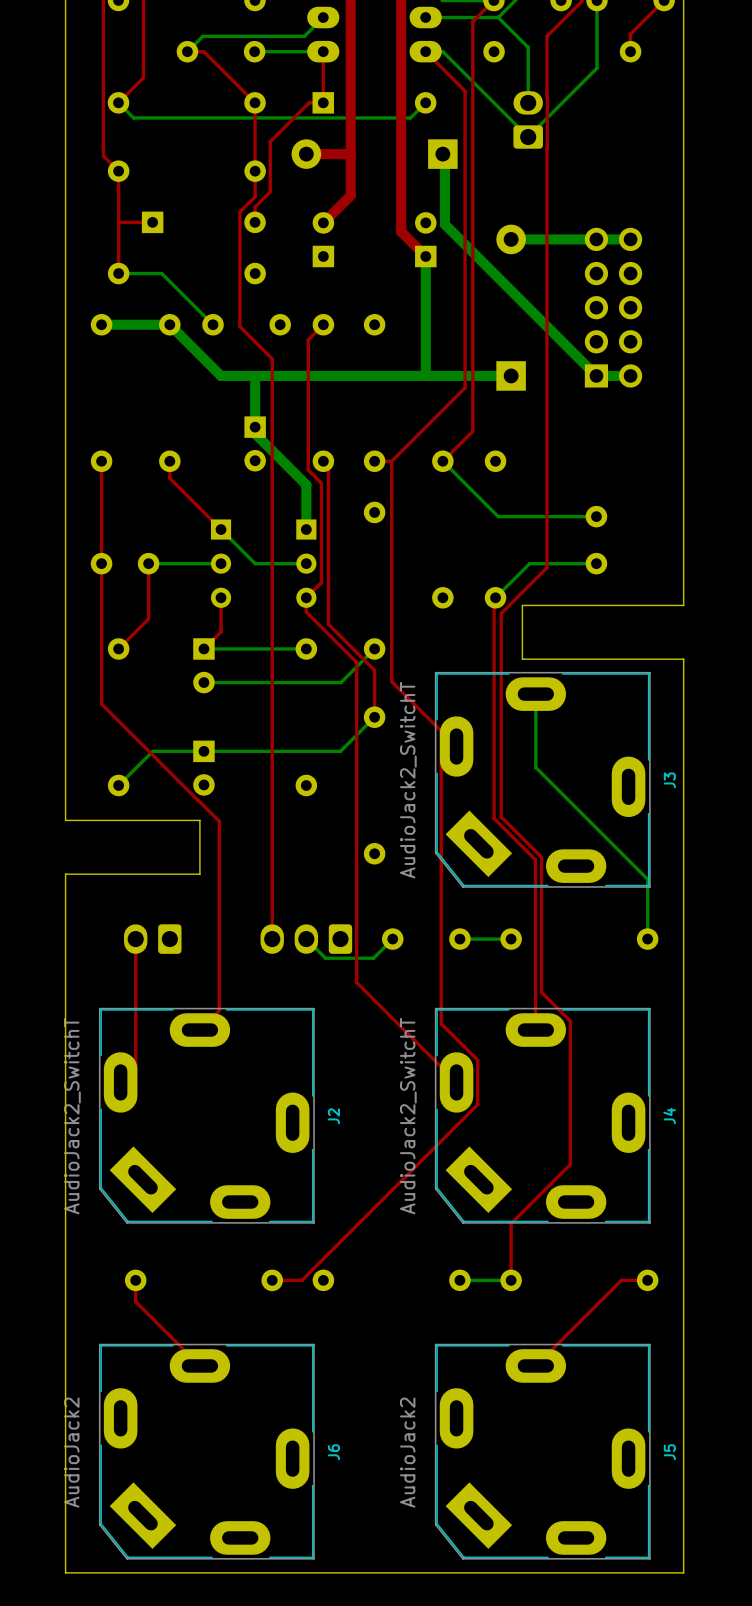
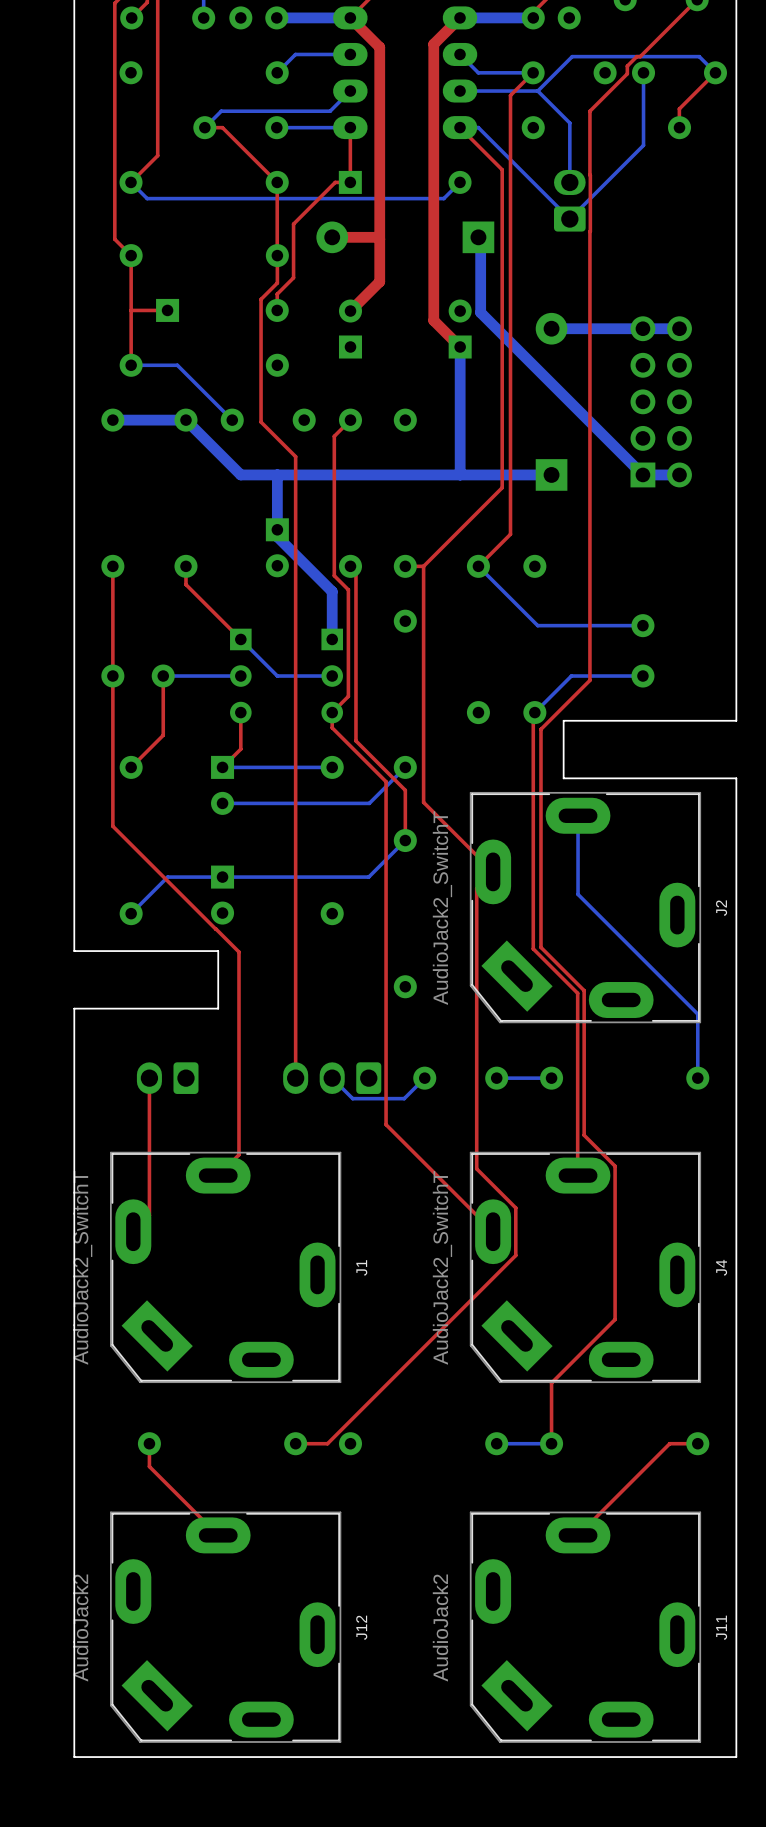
J3 name: J3 (669, 780) -> J2 (721, 908)
J2 name: J2 (333, 1116) -> J1 (361, 1267)
J6 name: J6 (333, 1452) -> J12 (361, 1627)
J5 name: J5 (669, 1452) -> J11 (721, 1627)

